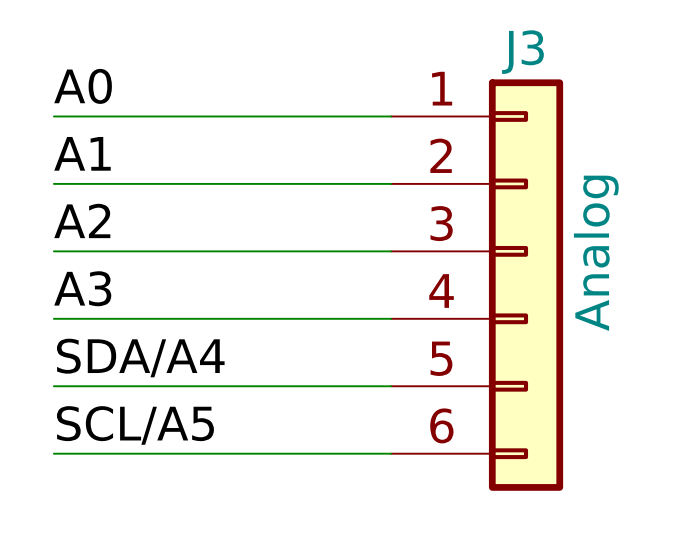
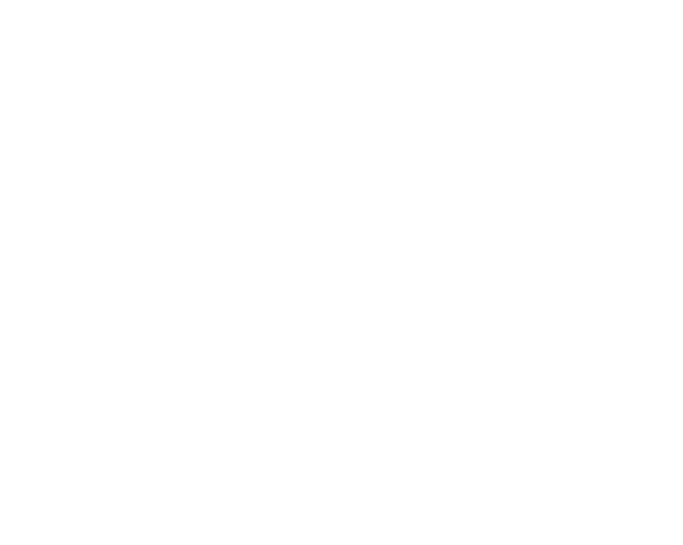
label: A0 (83, 86) -> none
wire: (53, 116) (391, 116) -> none
label: A1 (82, 153) -> none
wire: (53, 183) (391, 183) -> none
label: A2 (82, 220) -> none
wire: (53, 251) (391, 251) -> none
J3: Analog (477, 285) -> none
label: A3 (82, 288) -> none
wire: (53, 318) (391, 318) -> none
label: SDA/A4 (140, 358) -> none
wire: (53, 386) (391, 386) -> none
label: SCL/A5 (135, 425) -> none
wire: (53, 453) (391, 453) -> none

